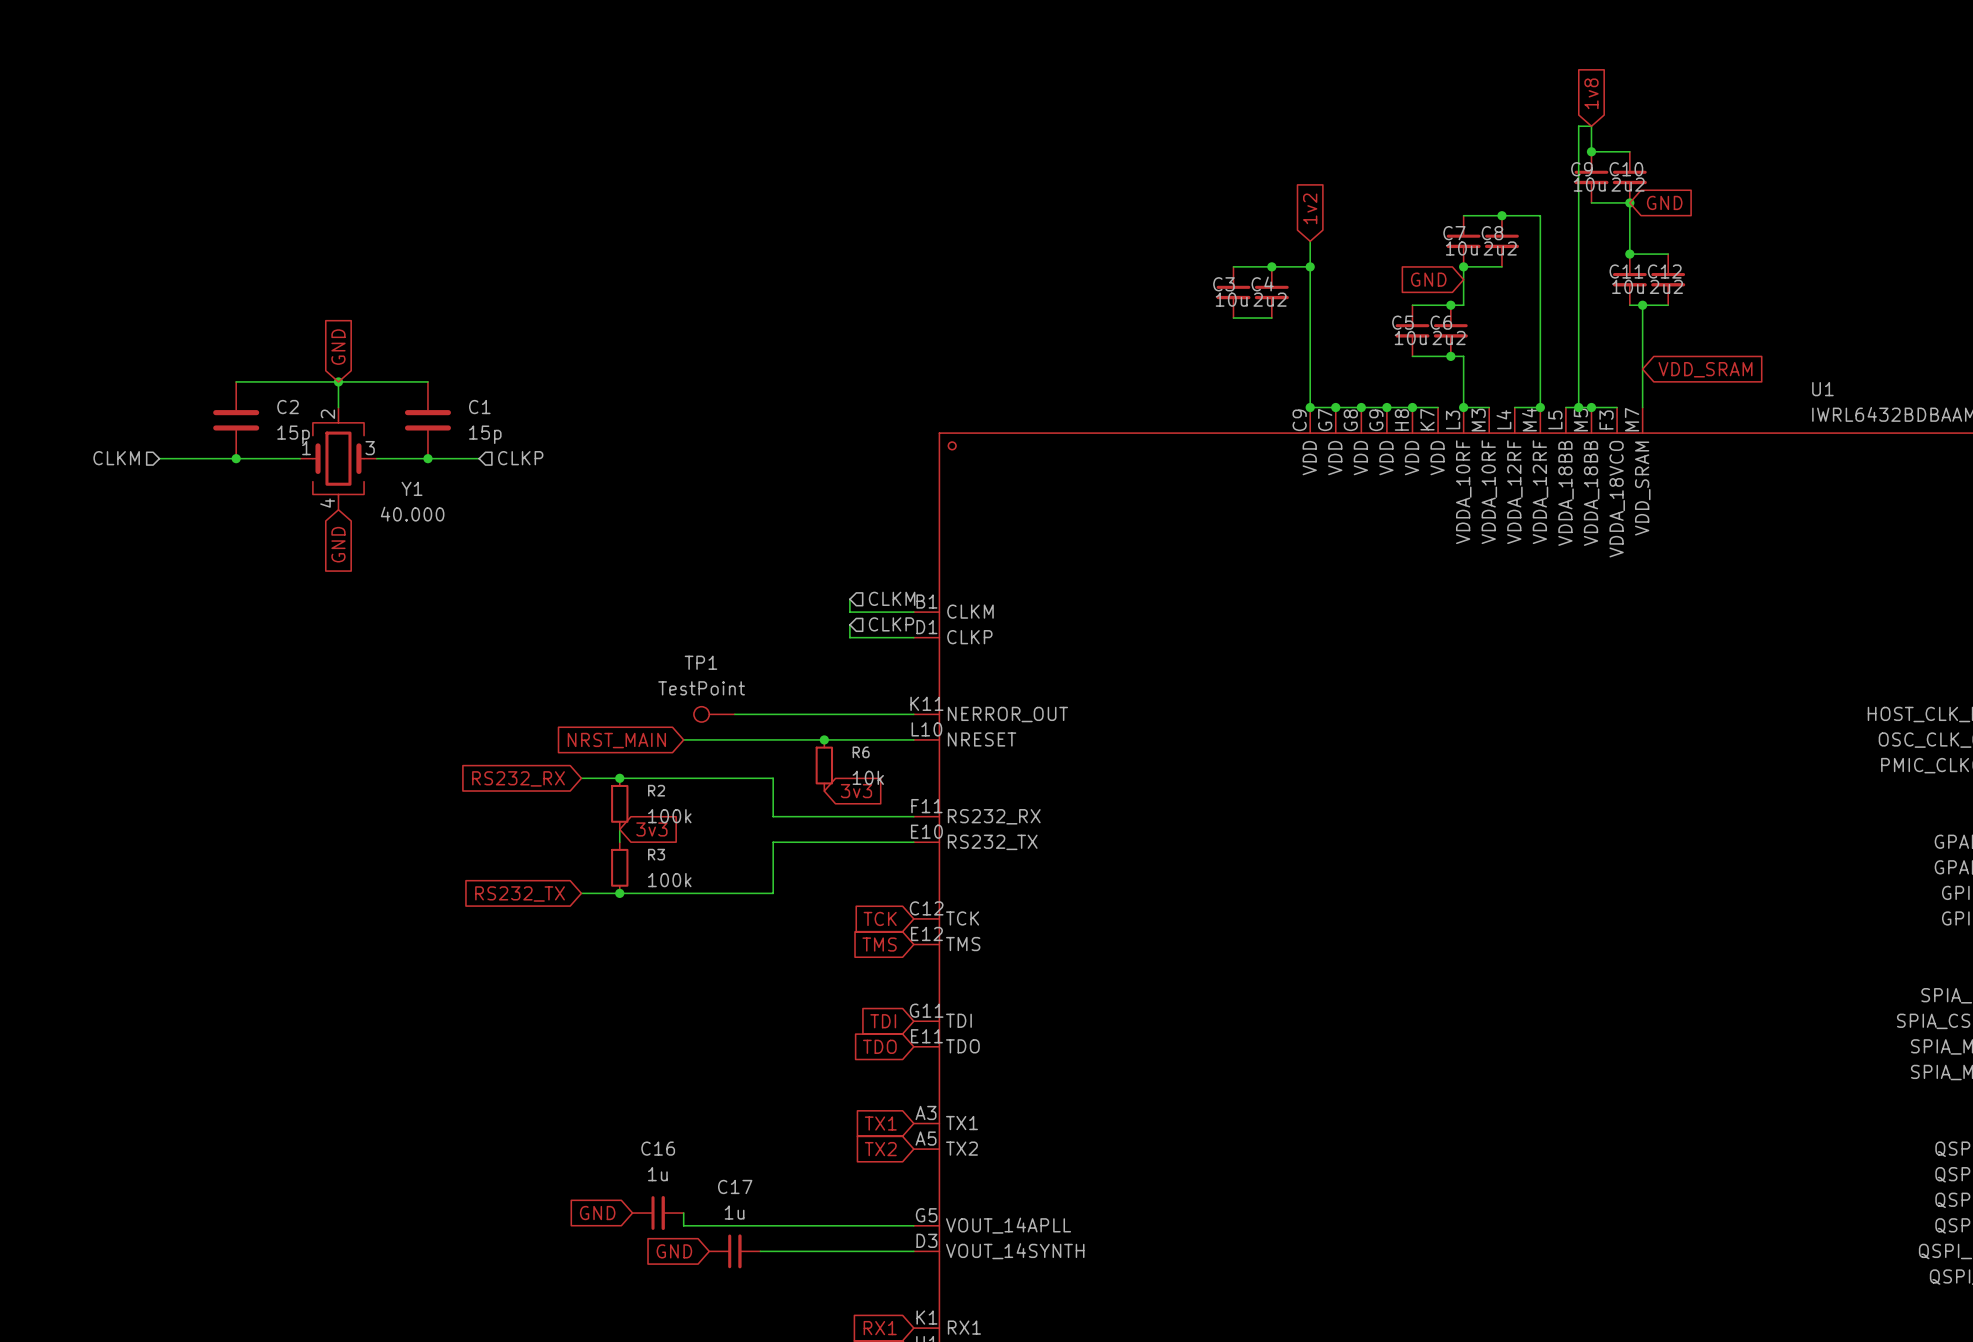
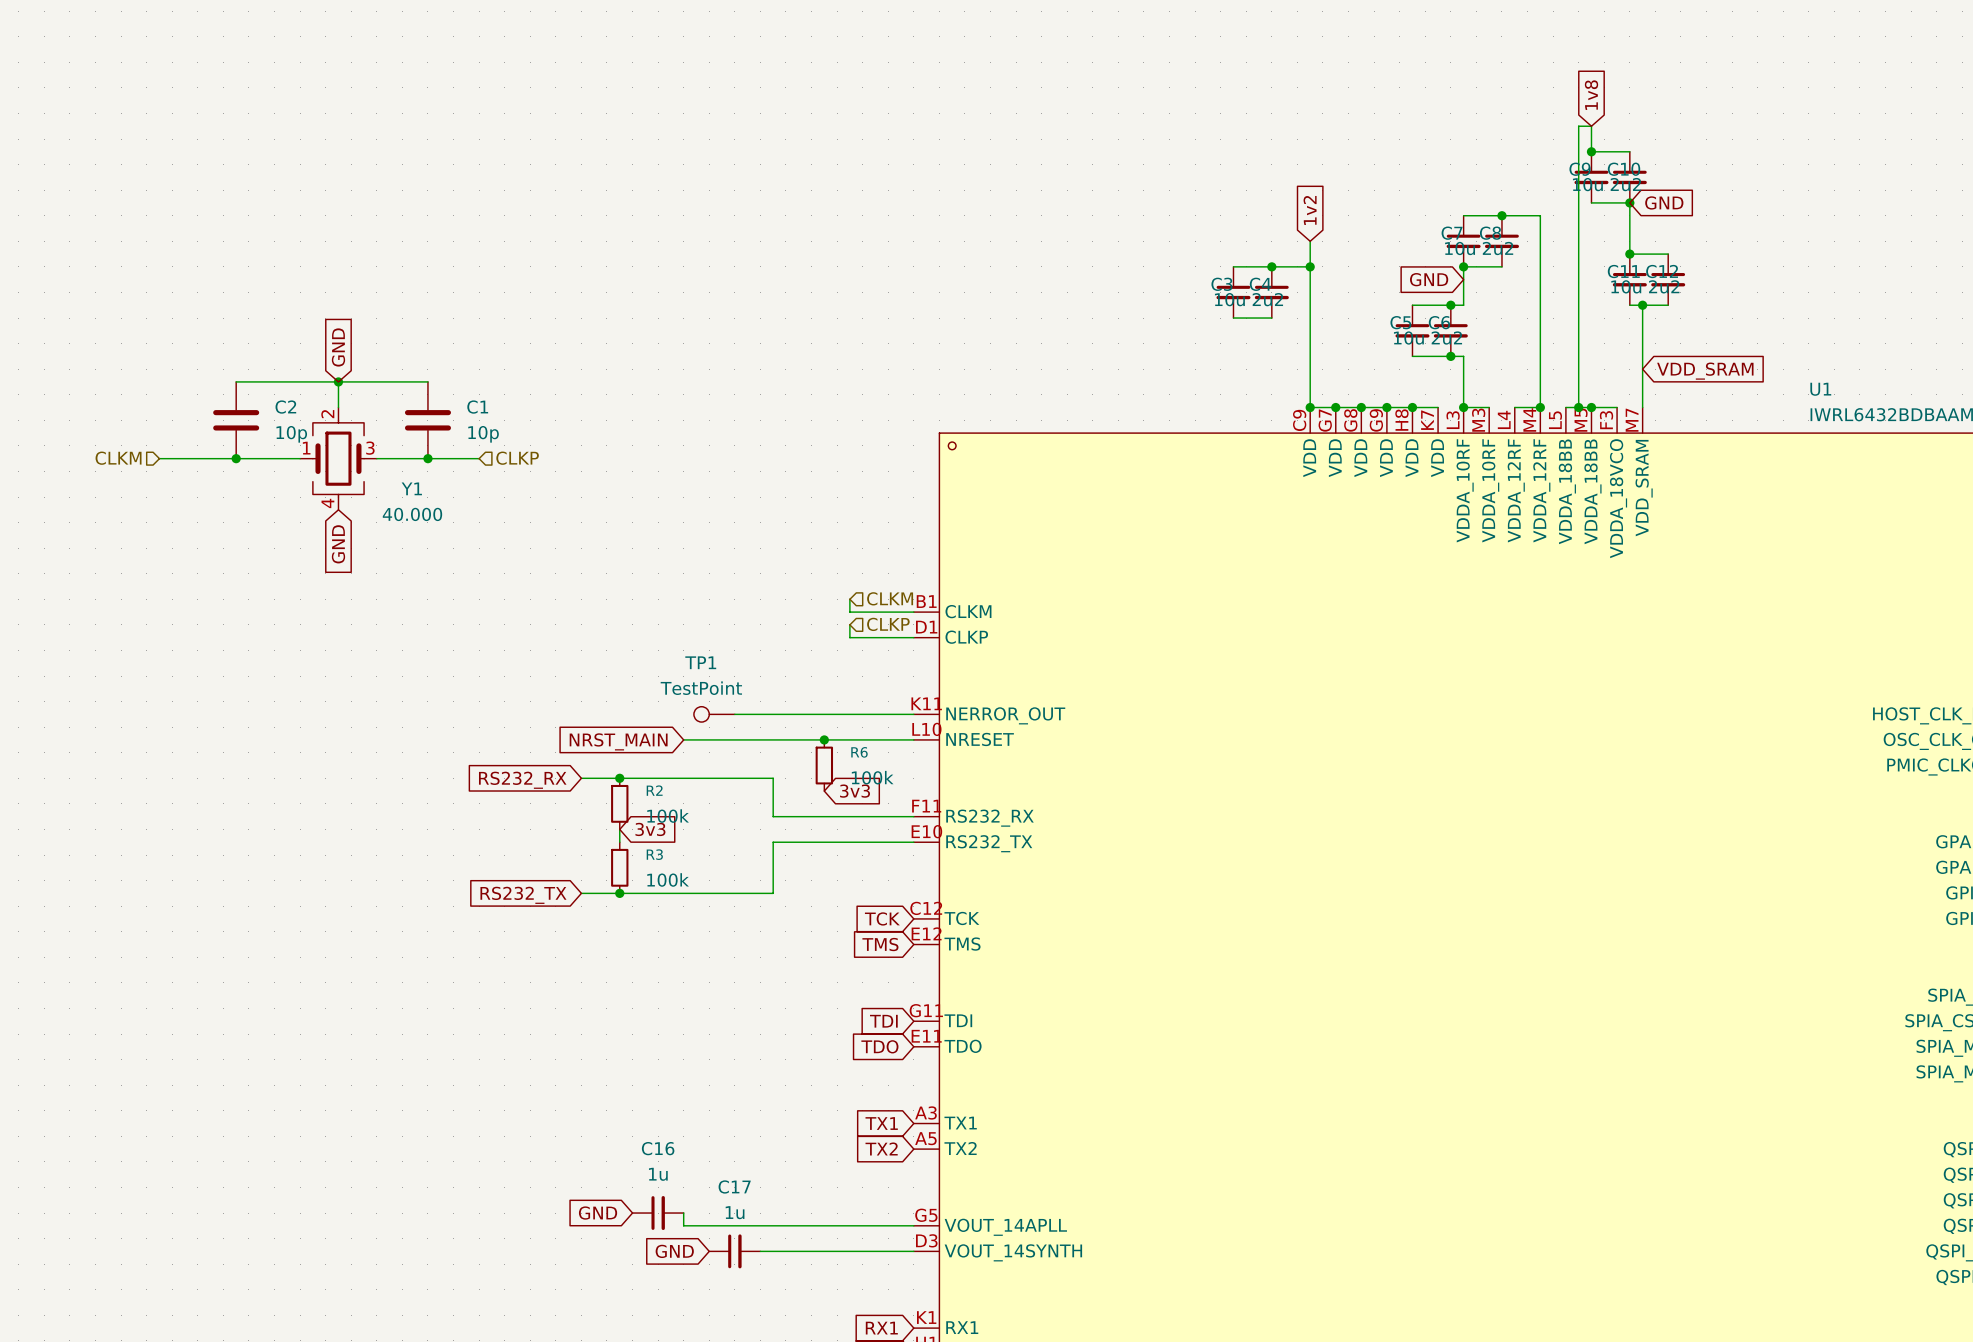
C2 value: 15p (293, 434) -> 10p (291, 434)
C1 value: 15p (485, 434) -> 10p (483, 434)
R6 value: 10k (868, 777) -> 100k (872, 777)

